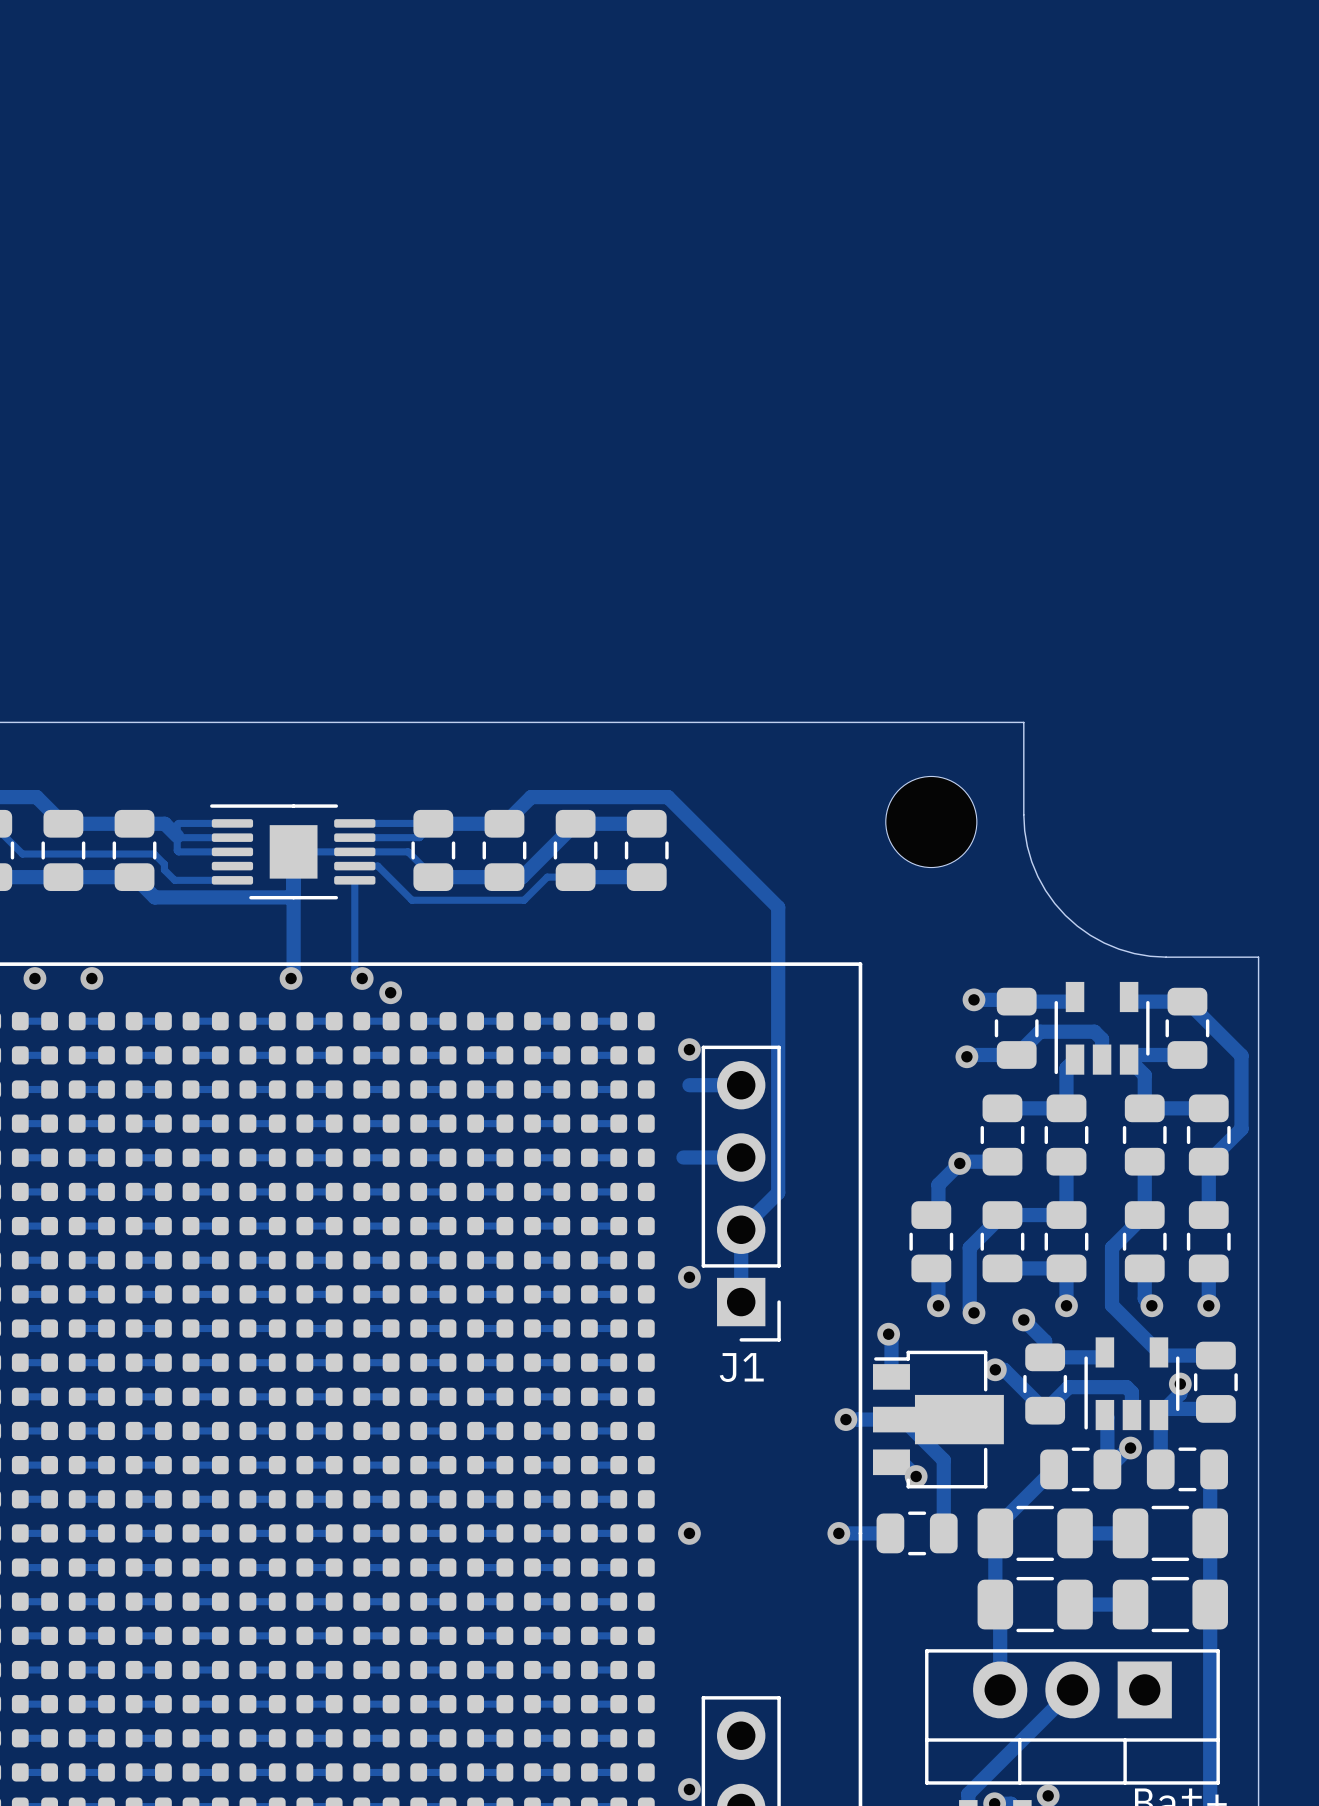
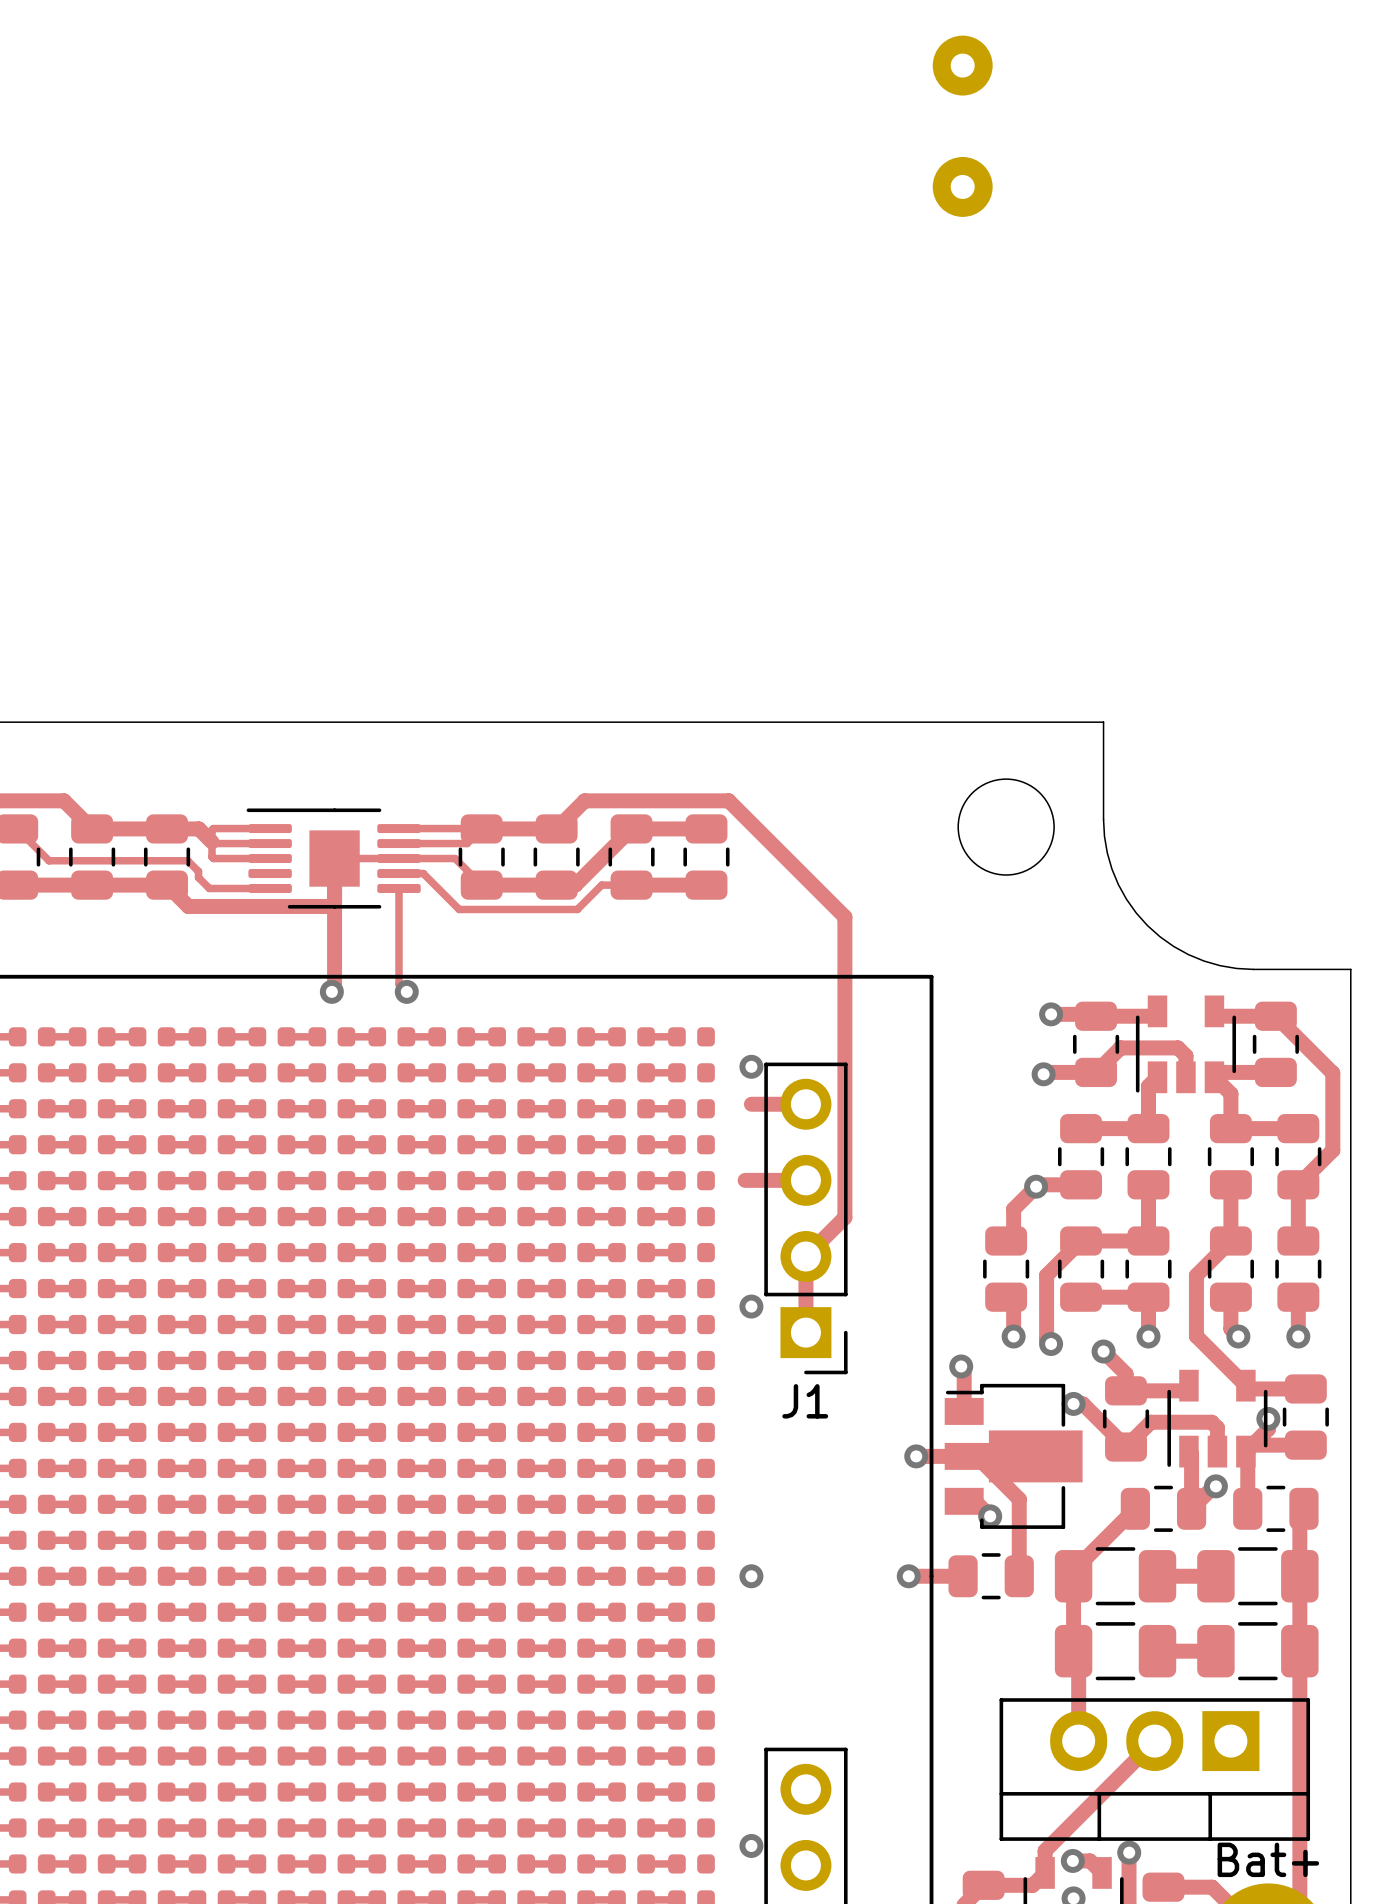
part: none -> (962, 65)
part: none -> (962, 186)
via: (34, 978) -> none
via: (91, 978) -> none
via: (390, 992) -> none

